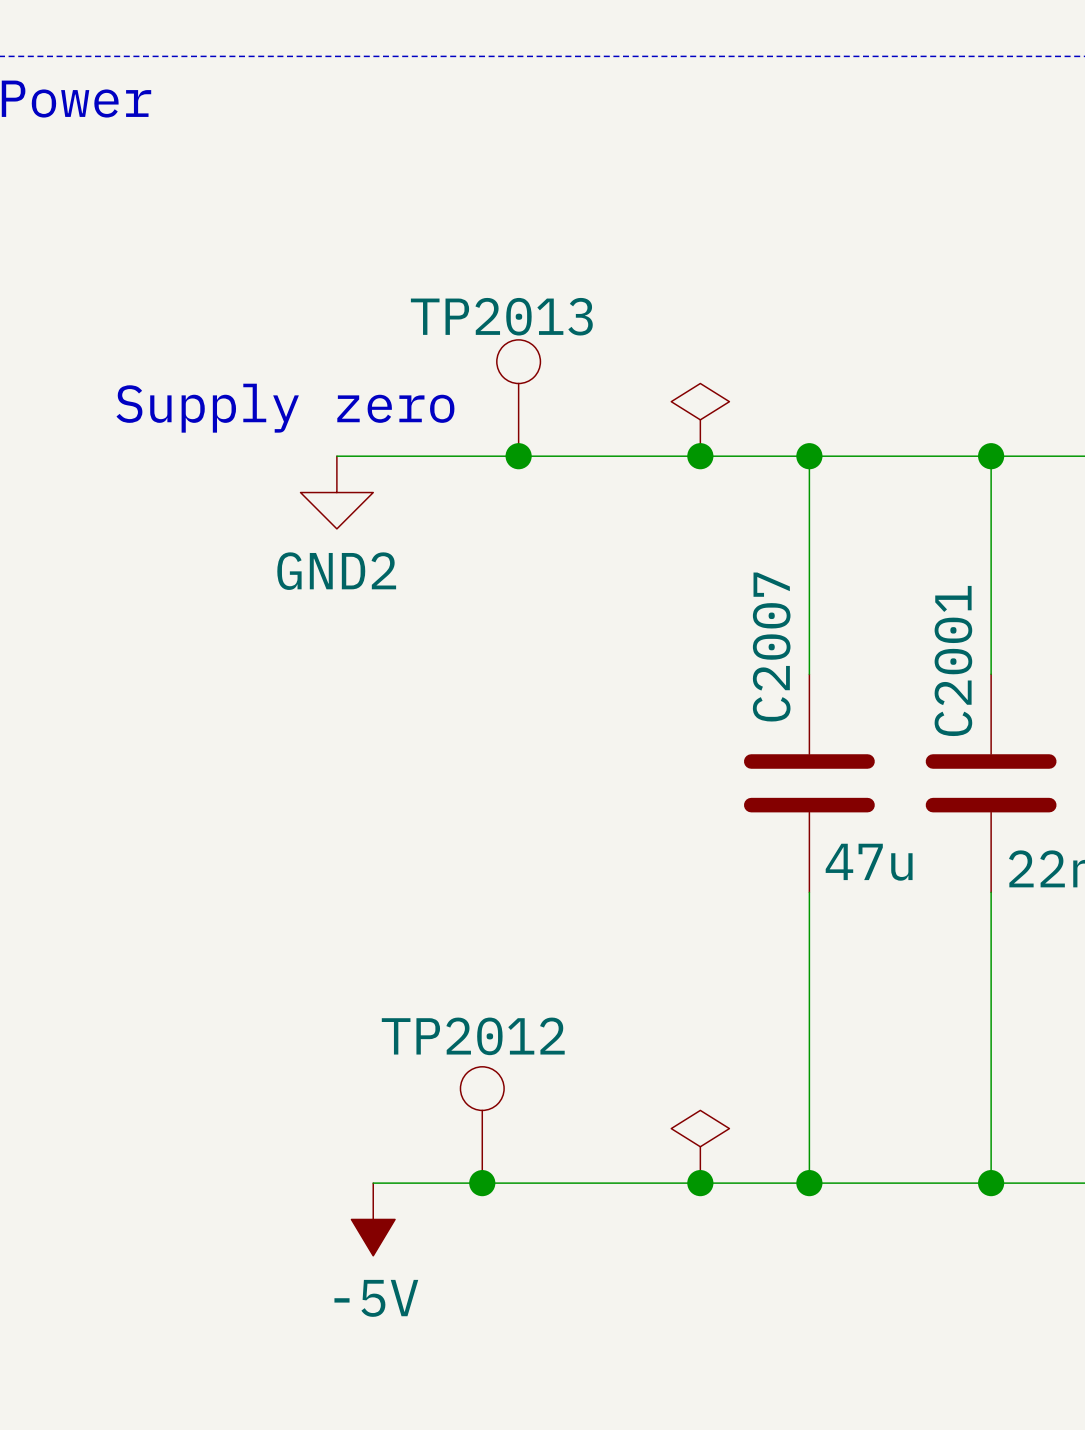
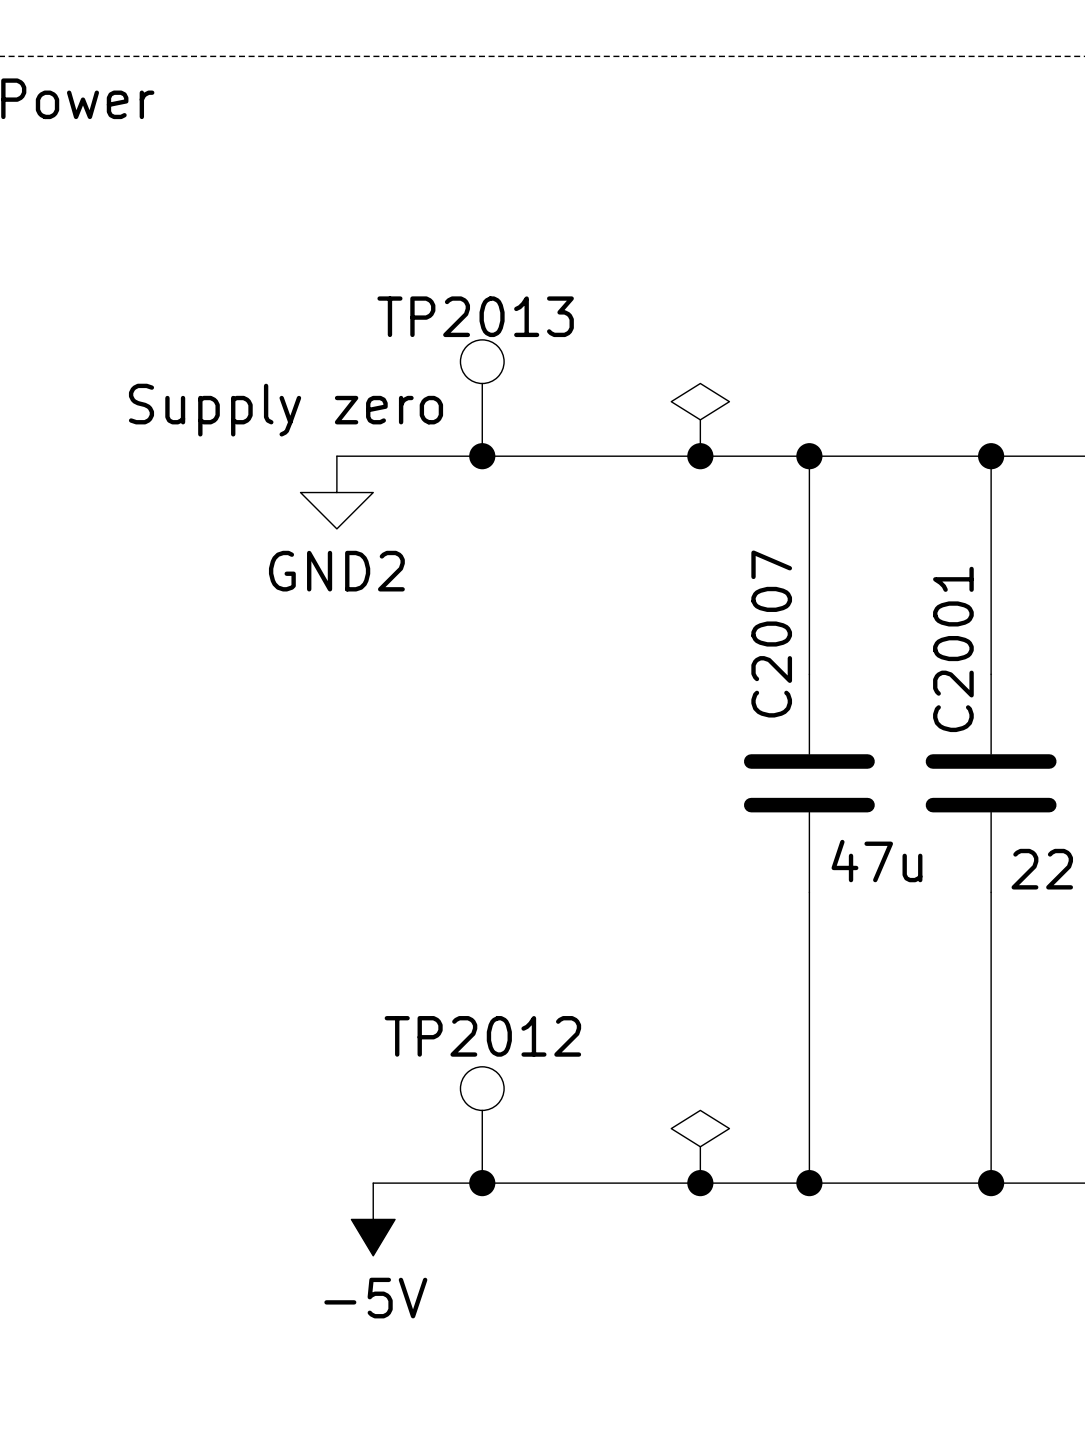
TP2013 position: (518, 398) -> (482, 398)
junction position: (518, 456) -> (482, 456)

